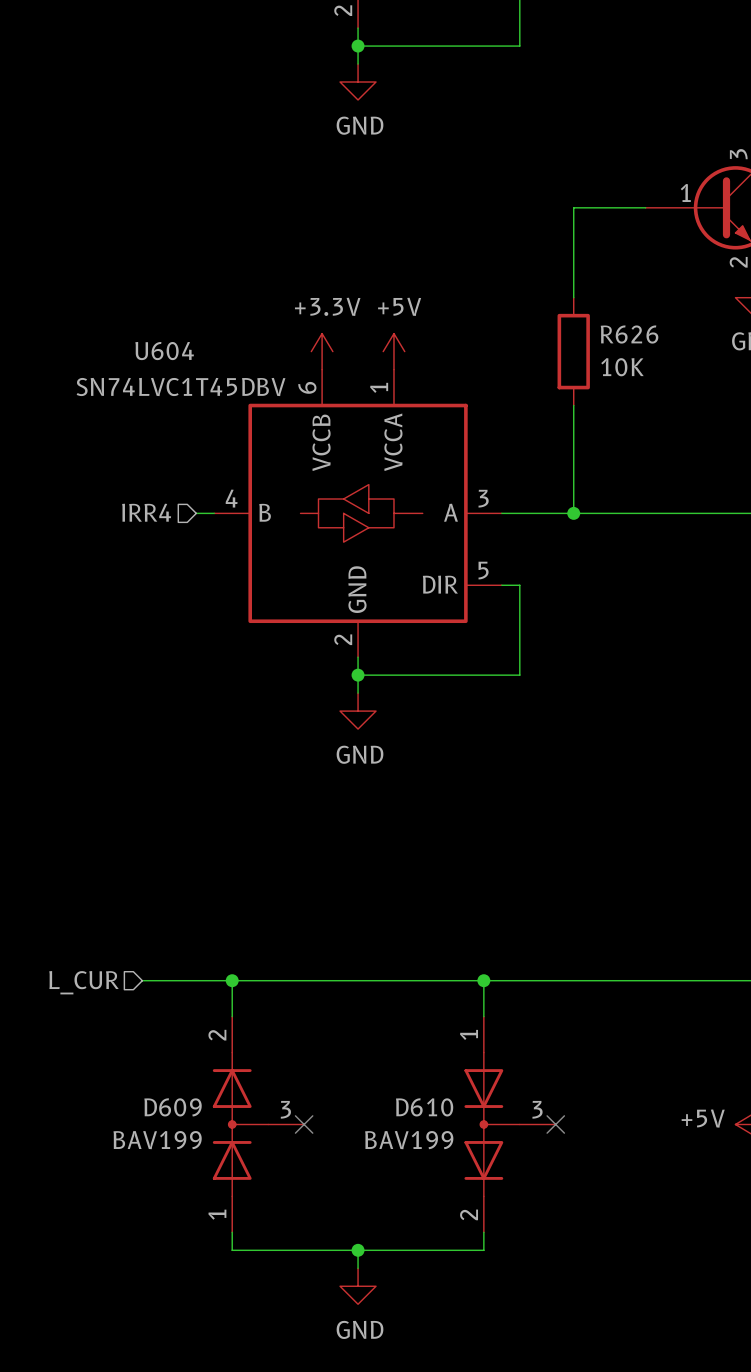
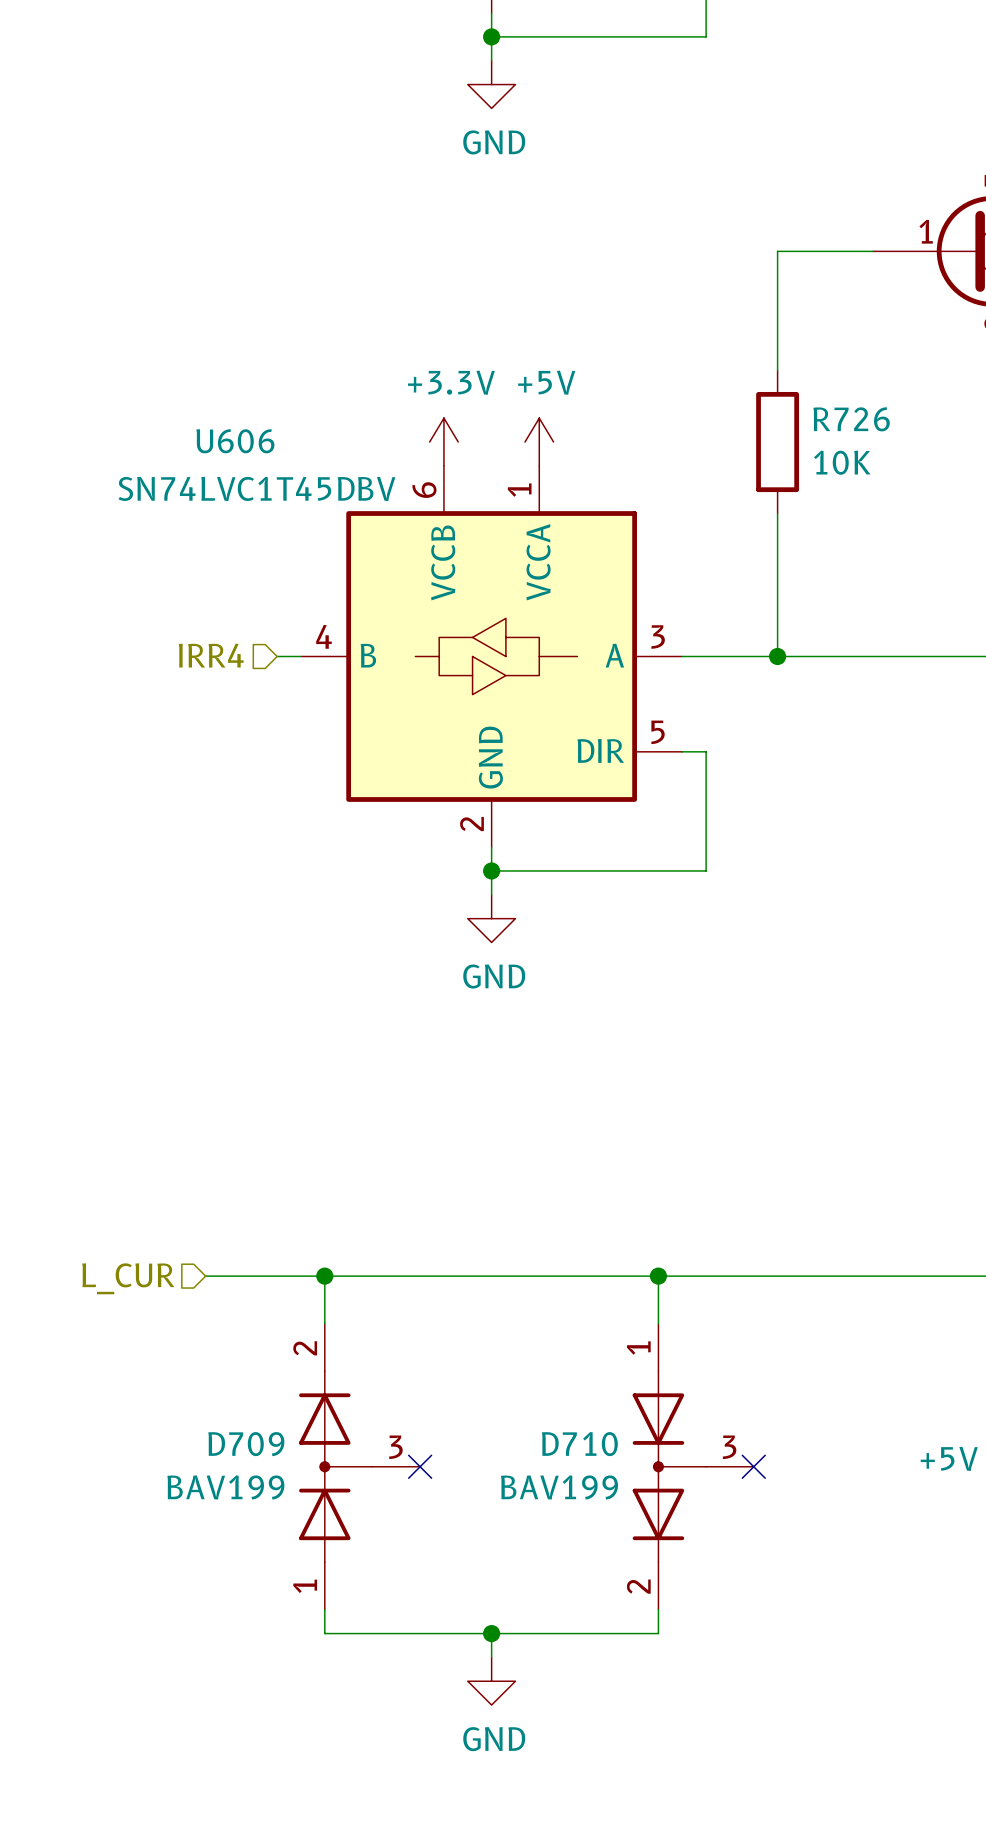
R626 name: R626 (629, 334) -> R726 (851, 419)
U604 name: U604 (164, 351) -> U606 (235, 441)
D609 name: D609 (173, 1107) -> D709 (246, 1444)
D610 name: D610 (424, 1107) -> D710 (579, 1444)

